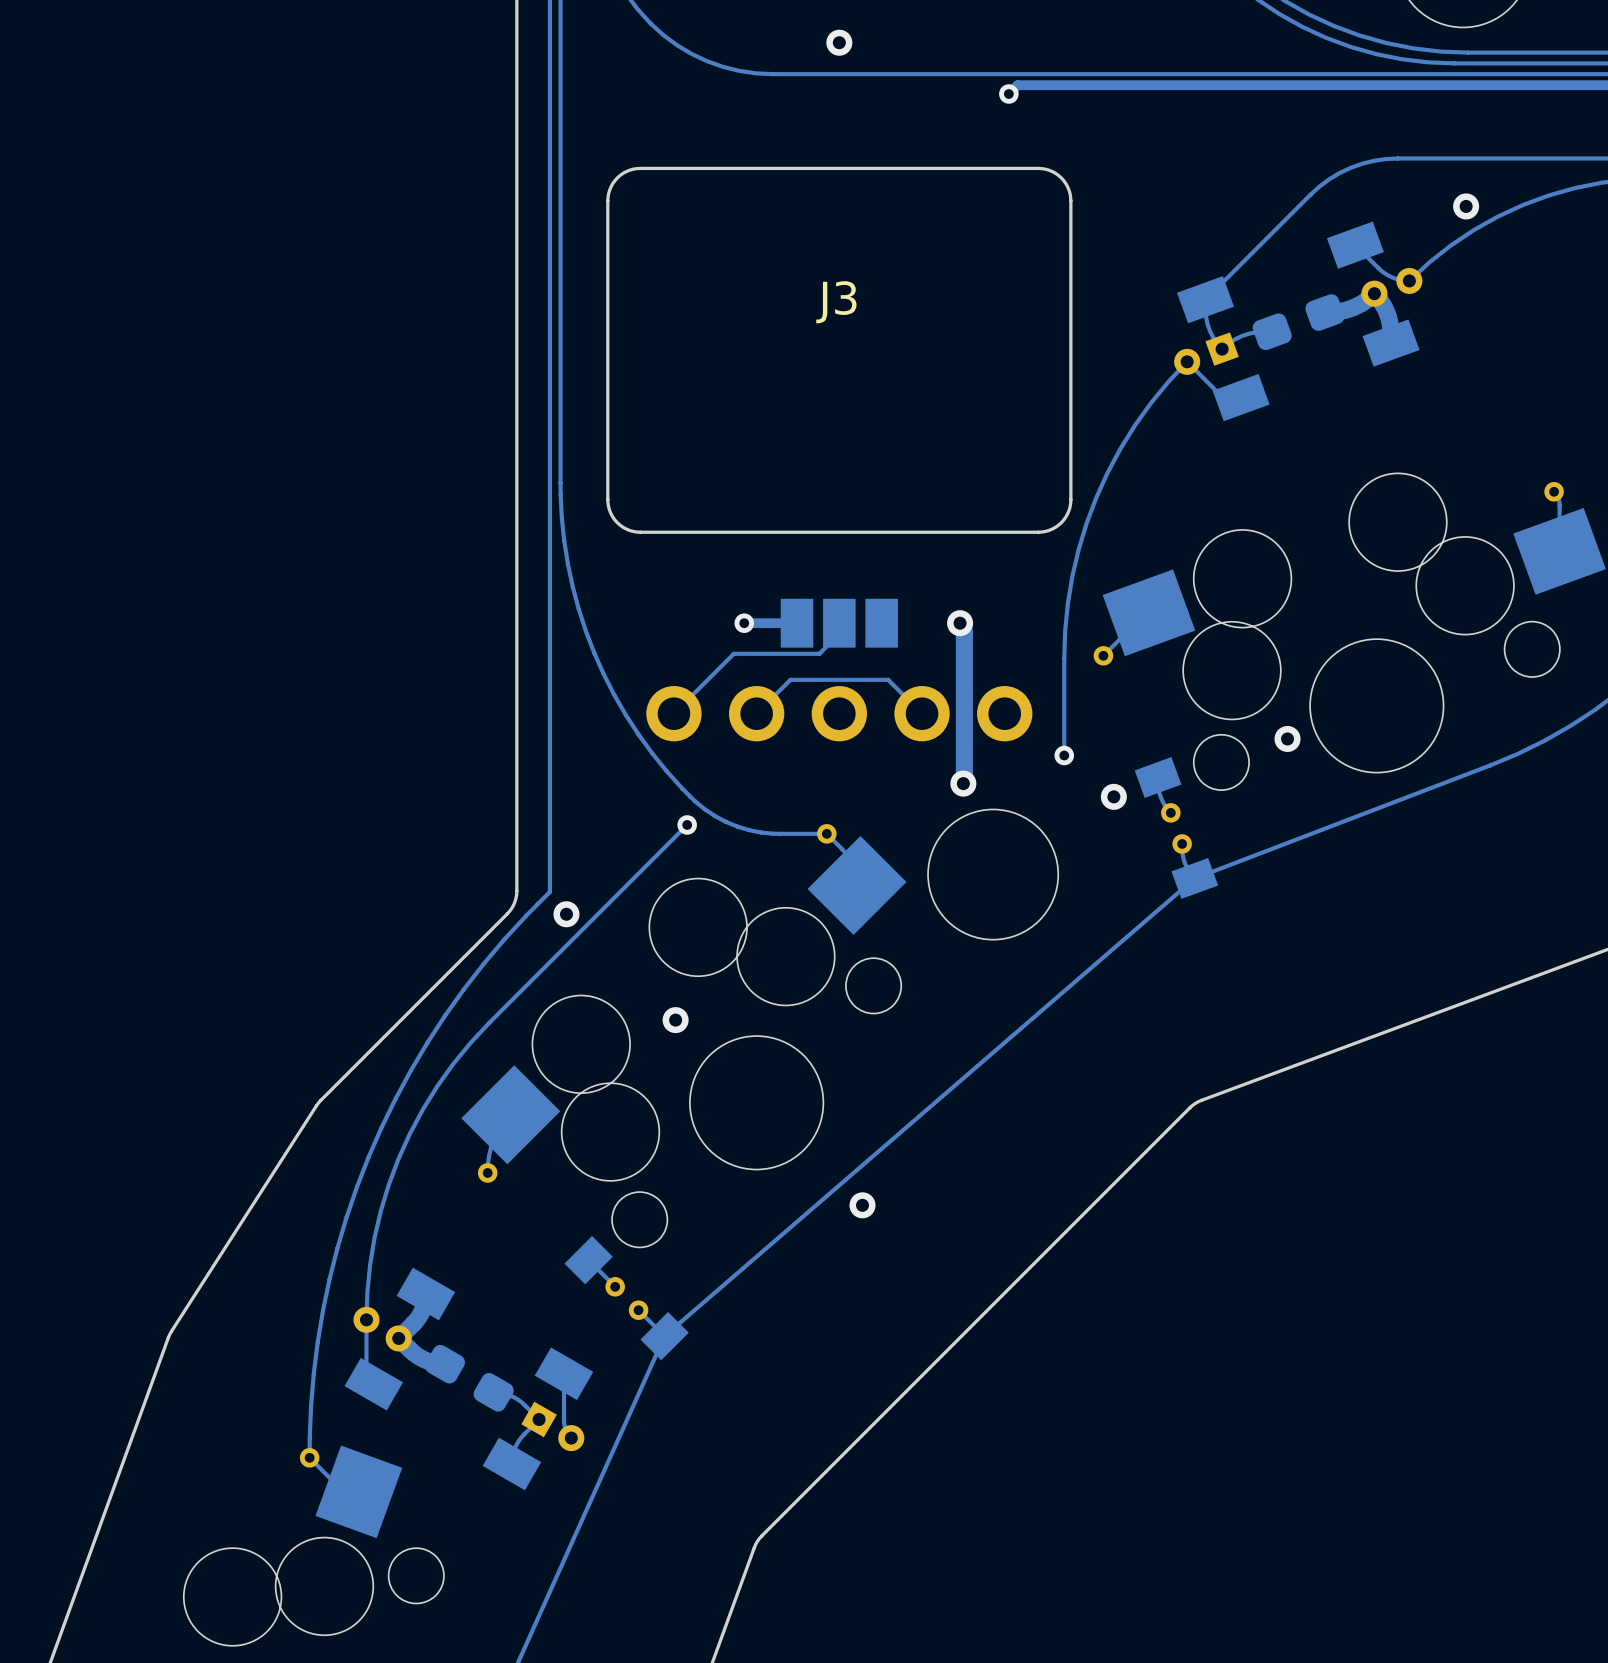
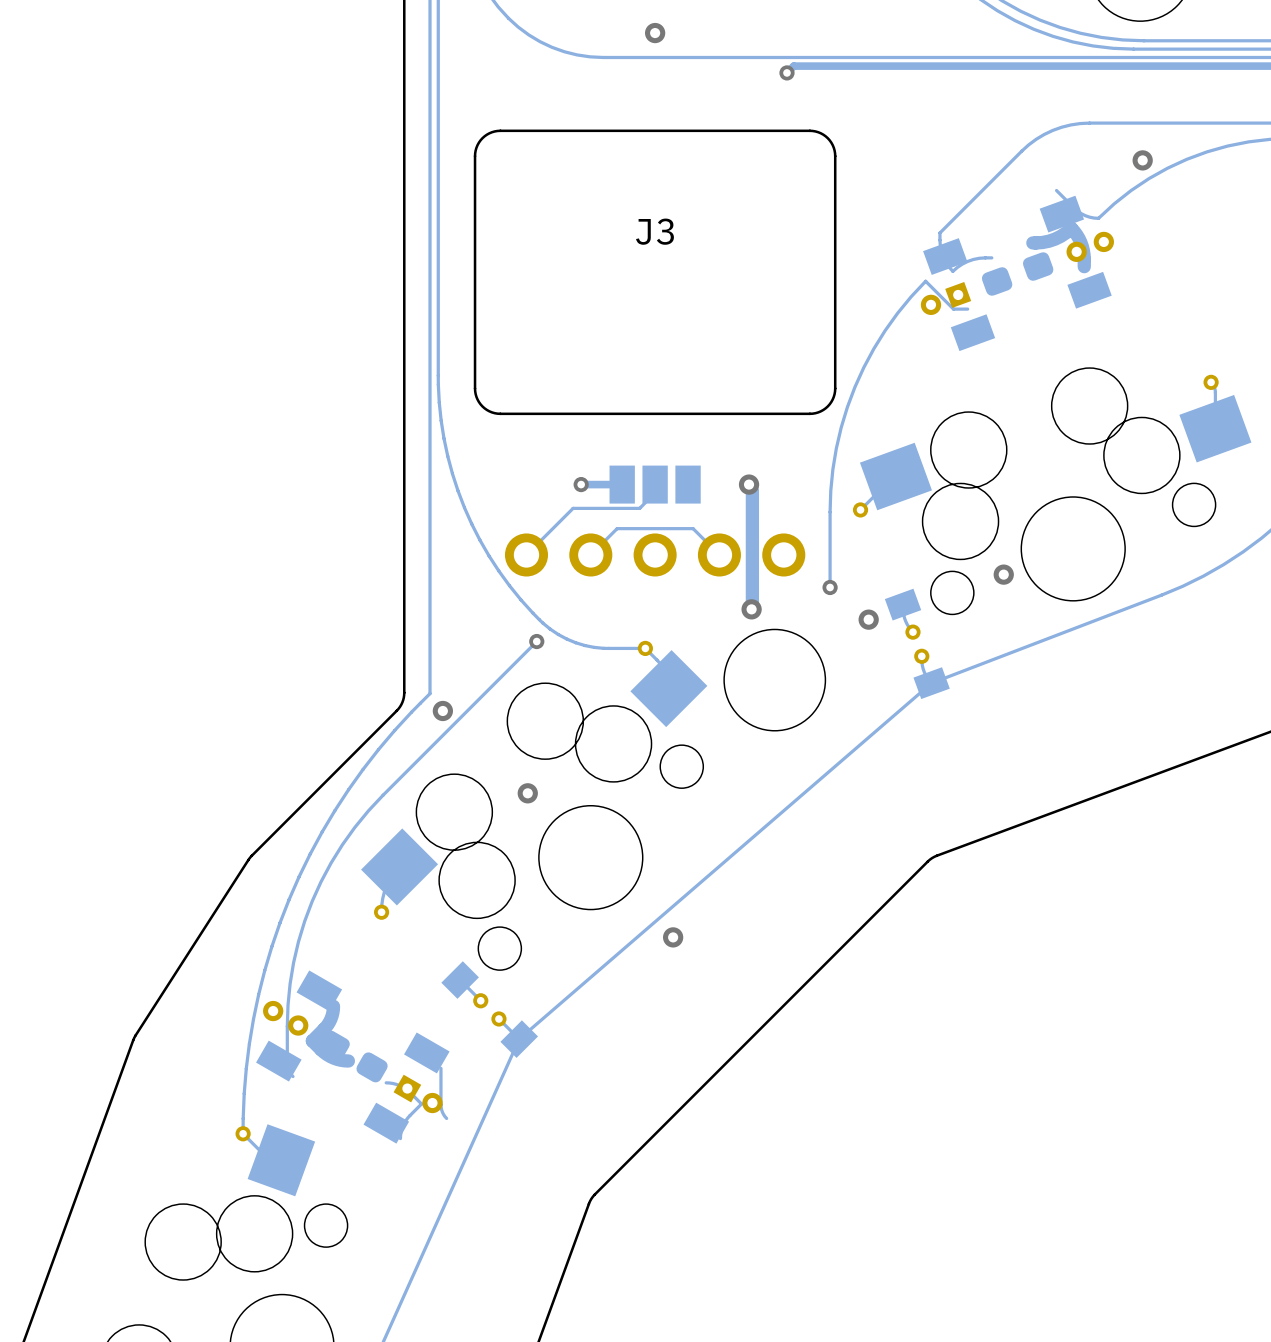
part position: (1298, 321) -> (1017, 273)
part position: (468, 1378) -> (352, 1057)

